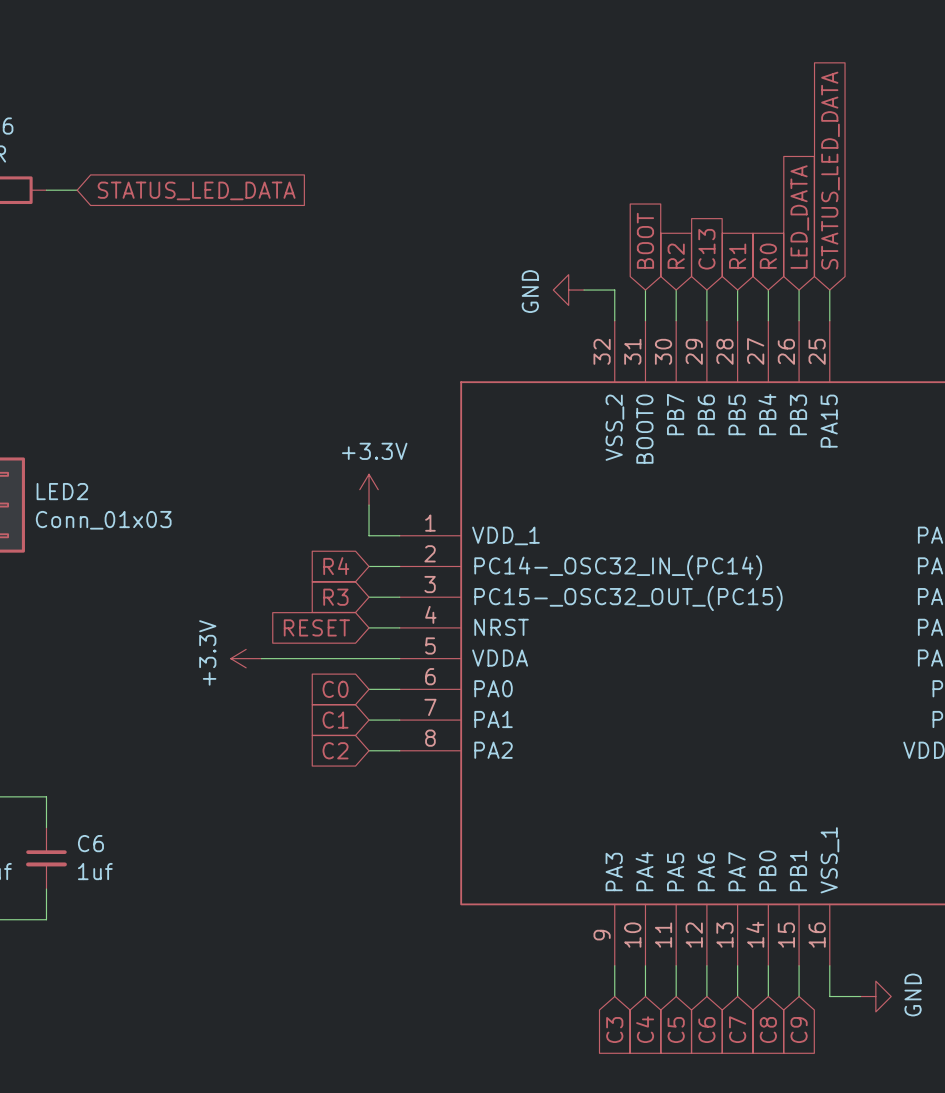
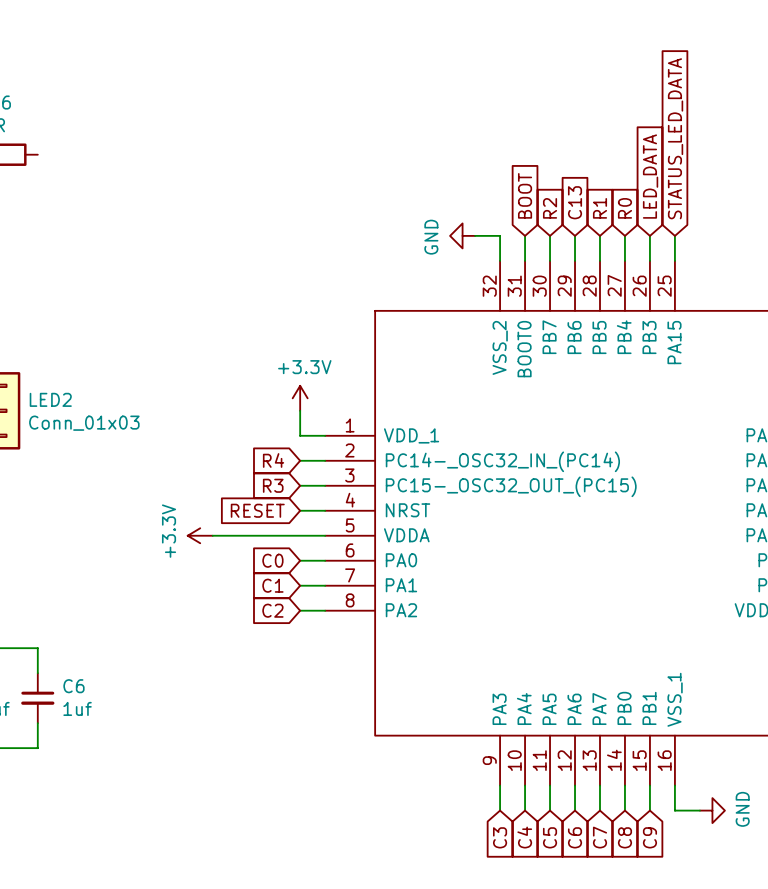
wire: (46, 190) (77, 190) -> none
global label: STATUS_LED_DATA (196, 190) -> none

